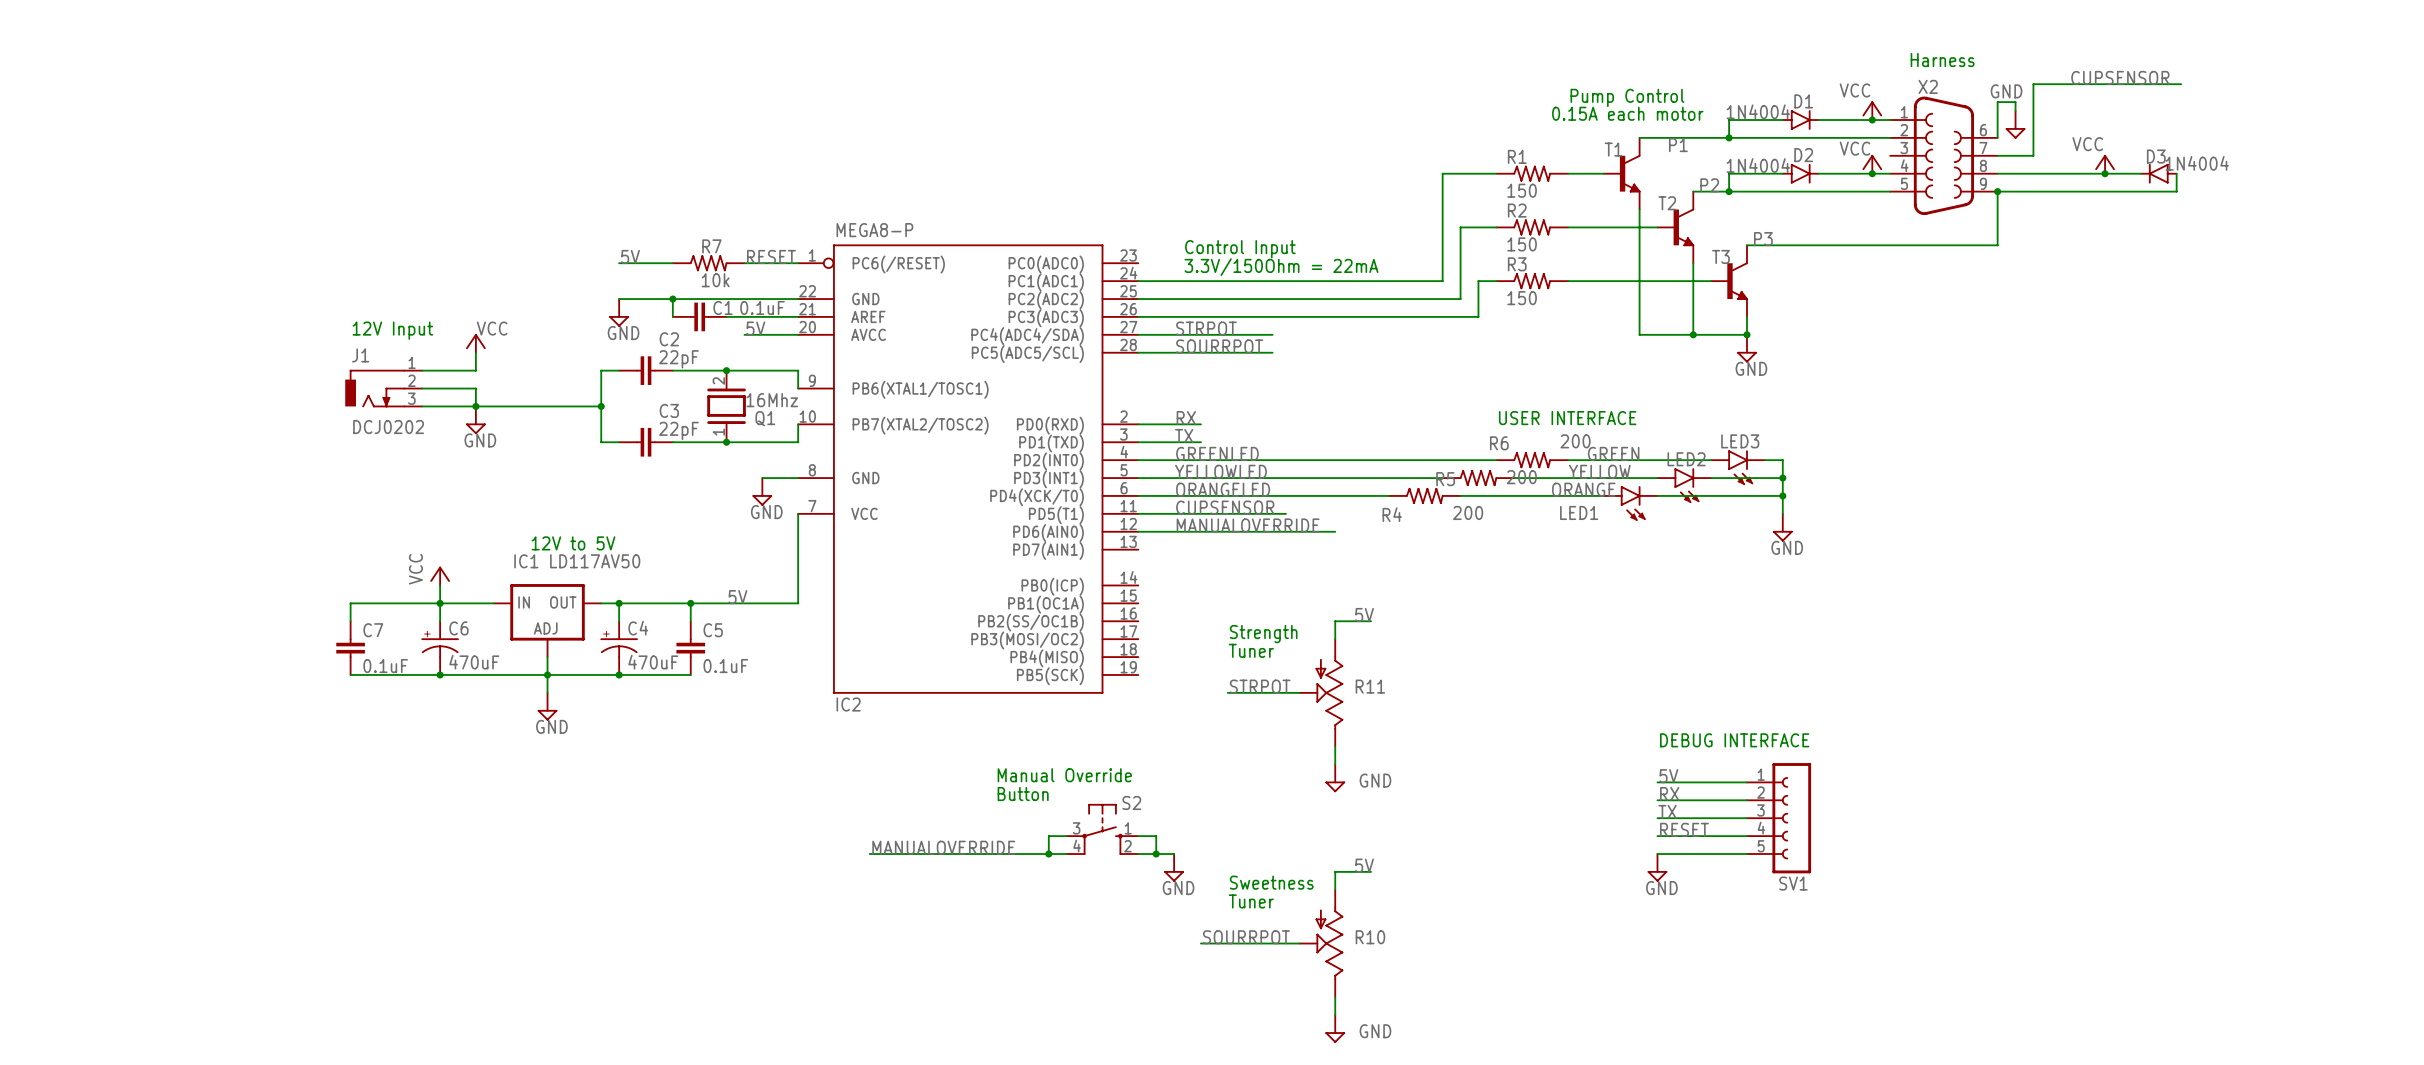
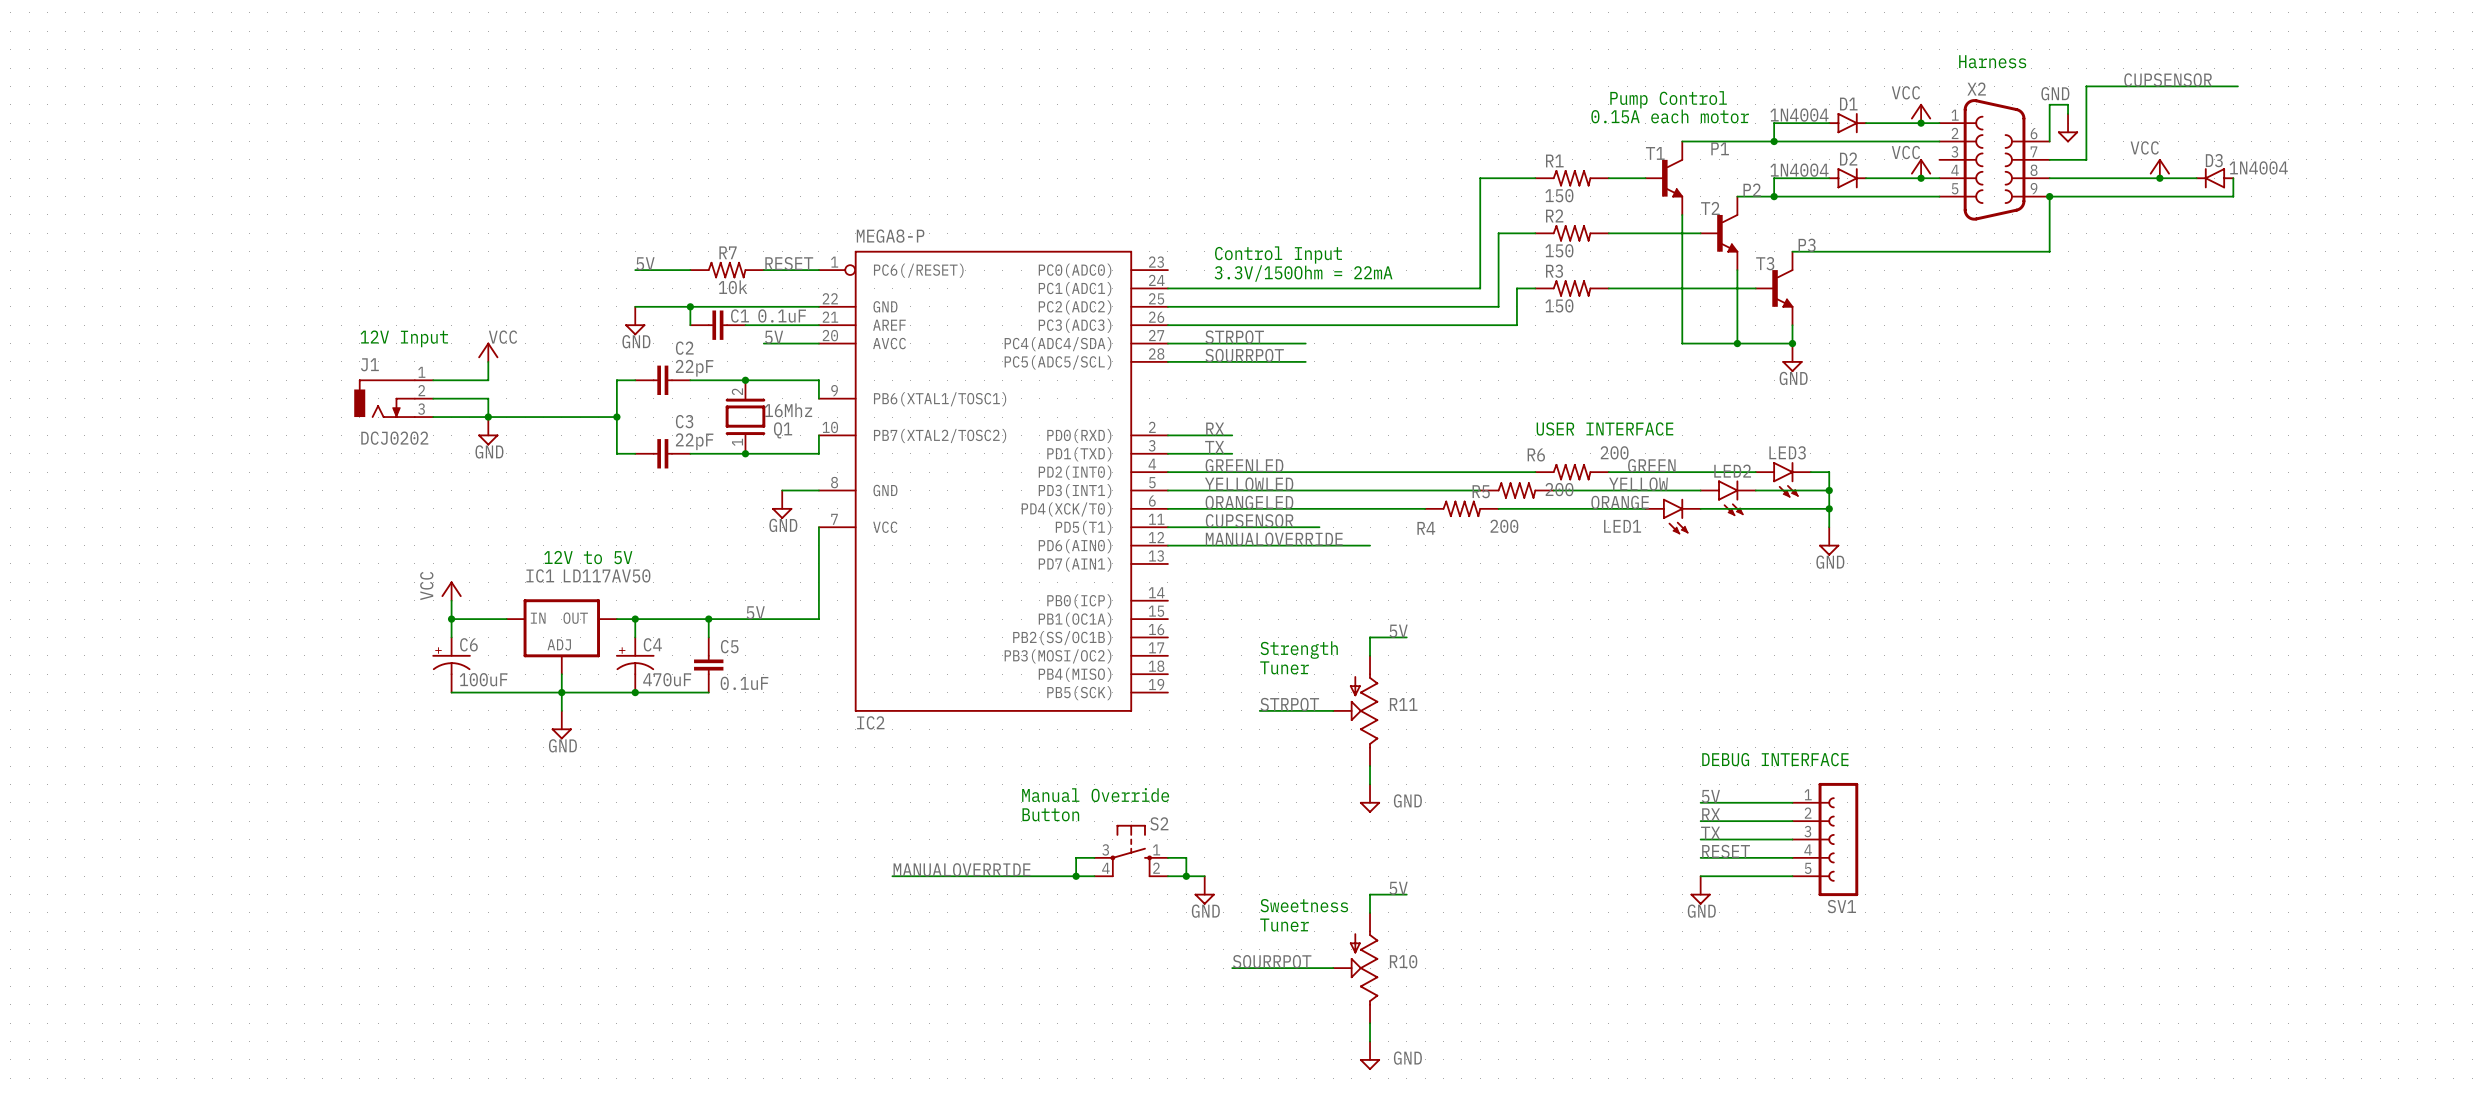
wire: (440, 603) (350, 603) (350, 621) -> none
C7: 0.1uF (350, 648) -> none
C6 value: 470uF (474, 662) -> 100uF (483, 679)
wire: (350, 674) (440, 674) -> none
junction: (440, 674) -> none

